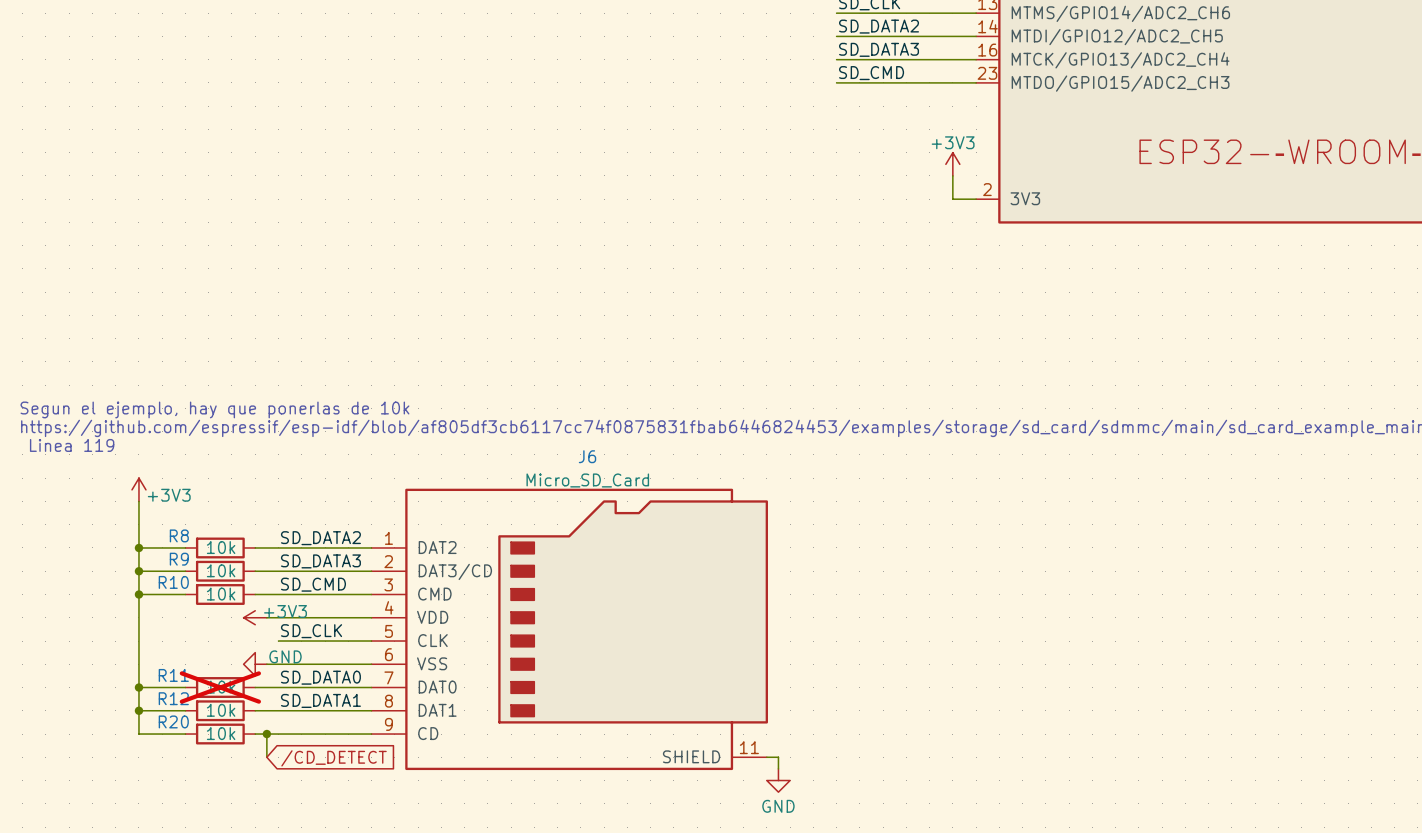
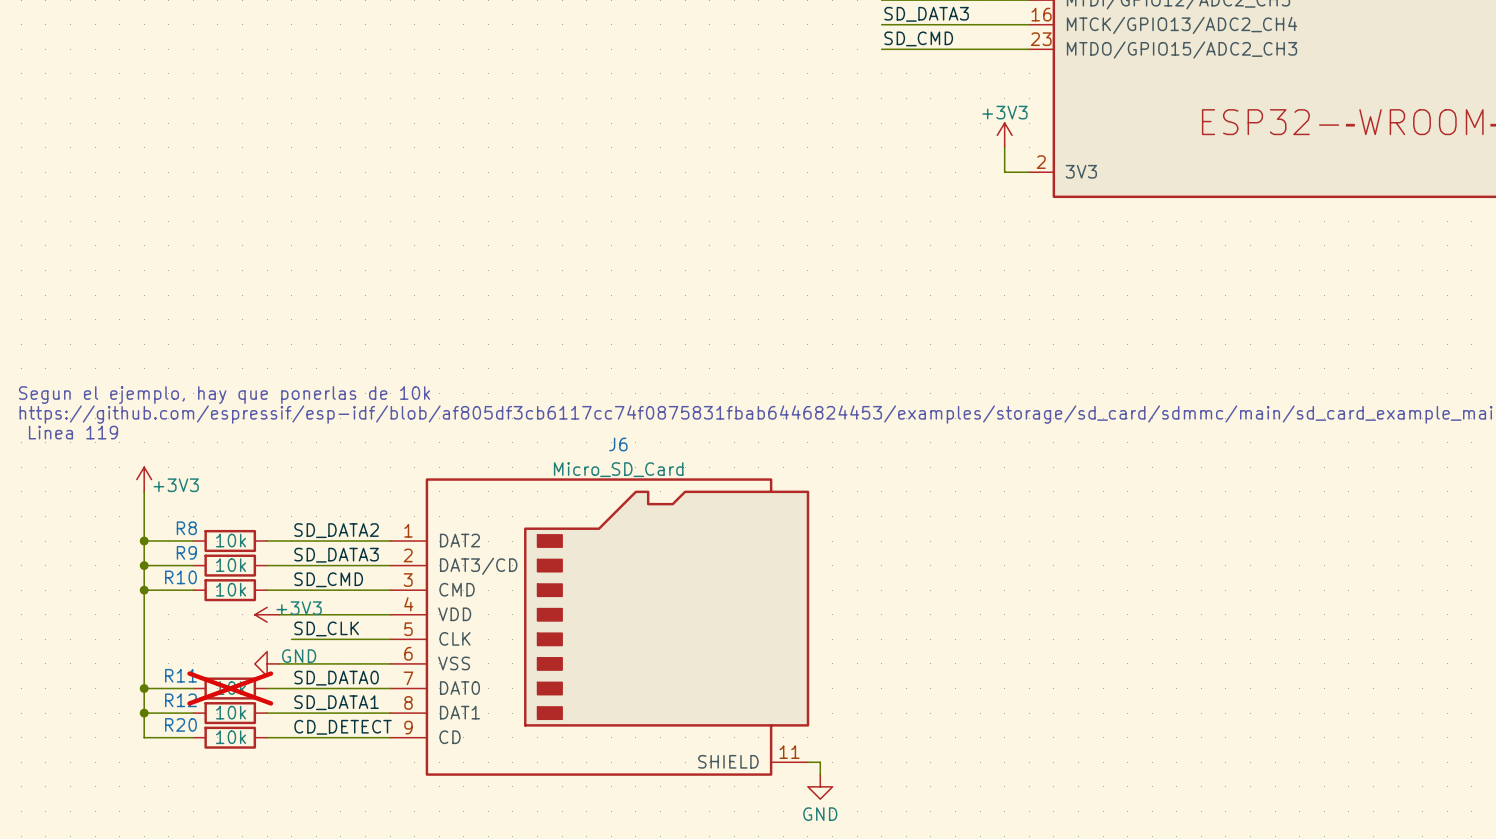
label: none -> CD_DETECT (343, 727)
wire: (266, 734) (266, 757) -> none
junction: (266, 734) -> none
global label: /CD_DETECT (334, 758) -> none

